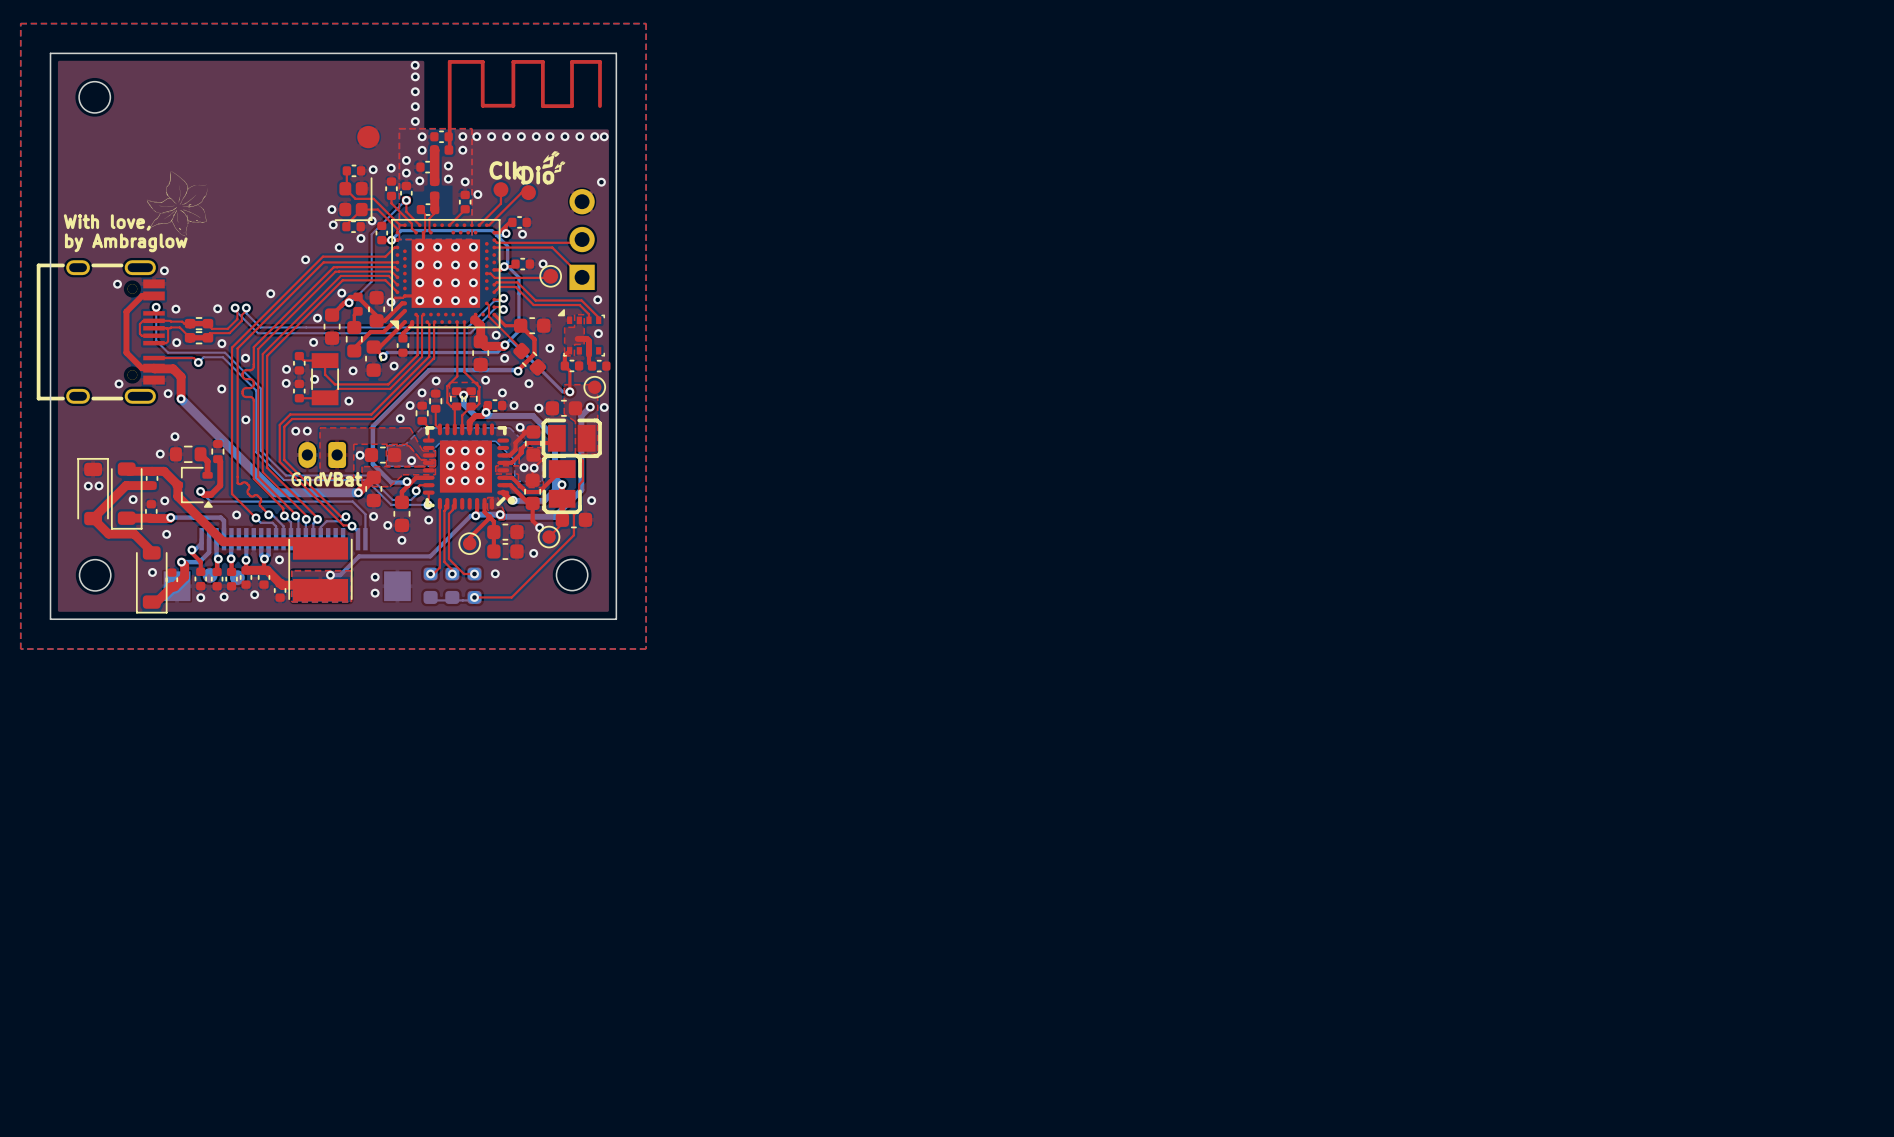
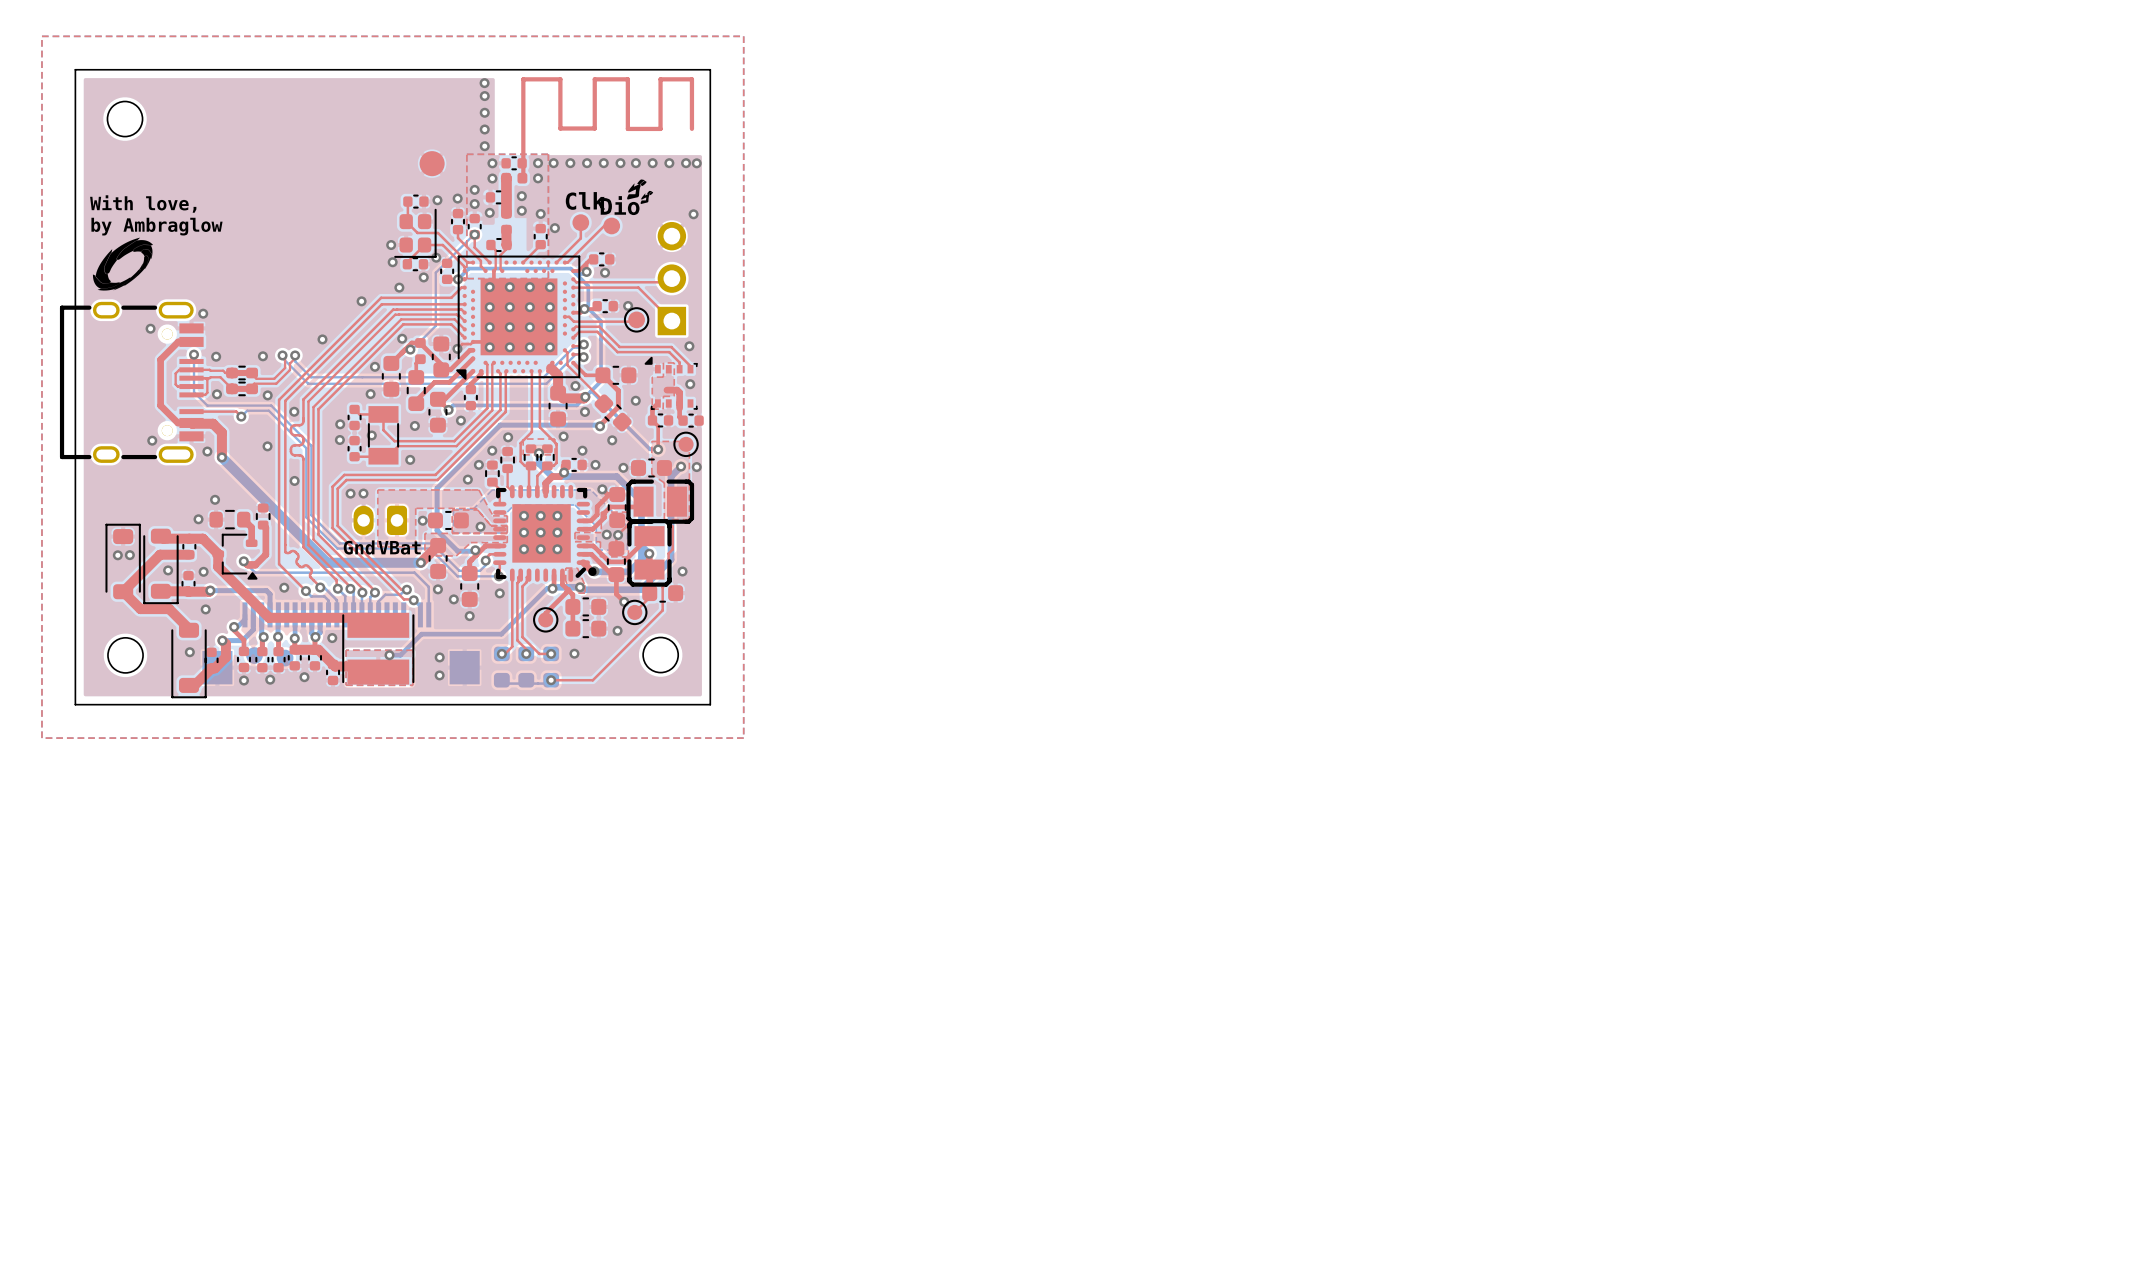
drawing: [146, 171, 208, 237] -> none
drawing: none -> [92, 237, 153, 291]
text position: With love, (107, 222) -> With love, (143, 204)
text position: by Ambraglow (126, 242) -> by Ambraglow (156, 226)

